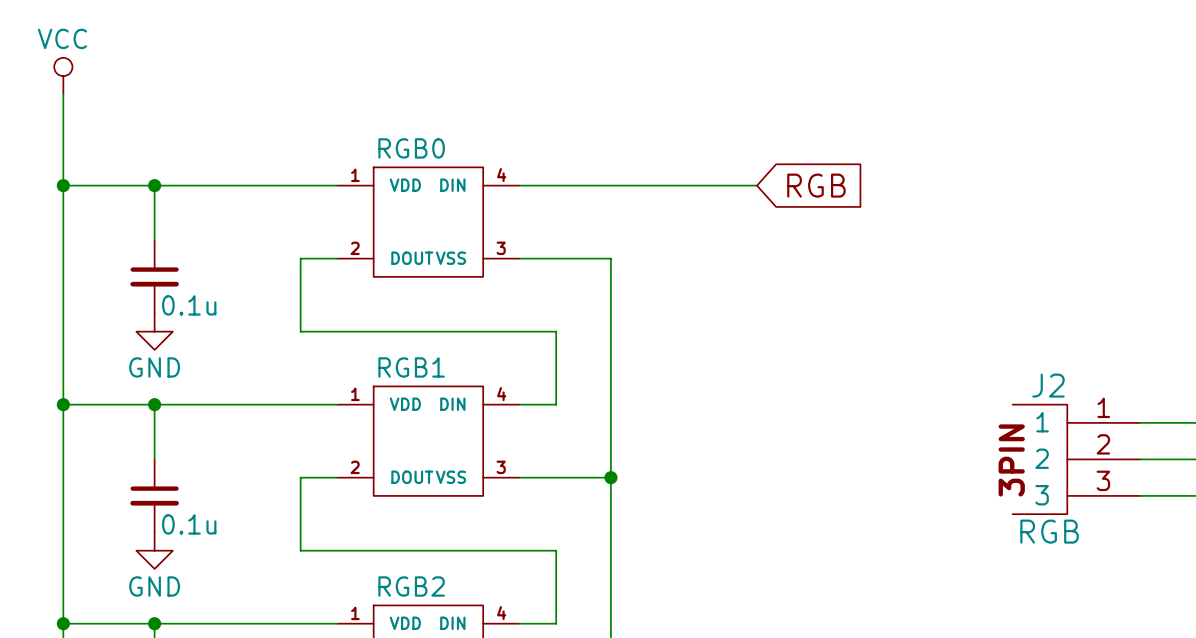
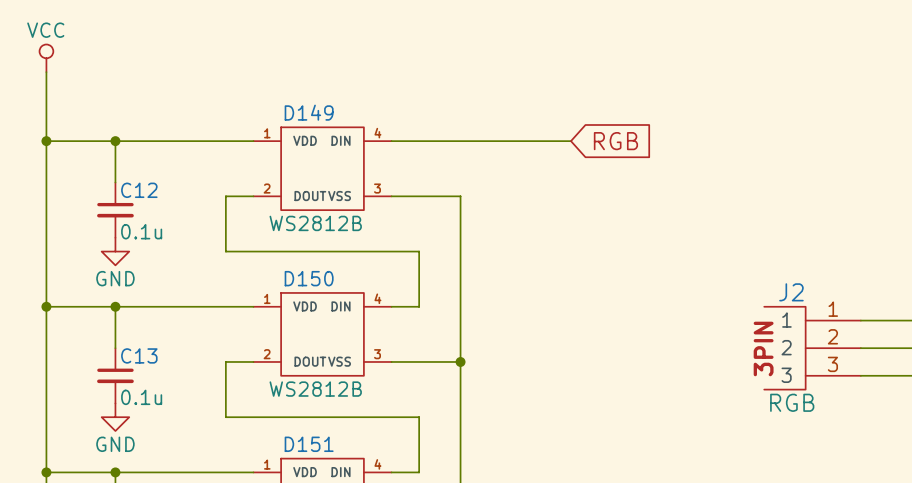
RGB0 name: RGB0 (411, 148) -> D149 (309, 112)
C12 name: none -> C12 (139, 190)
RGB0 value: none -> WS2812B (315, 223)
RGB1 name: RGB1 (411, 367) -> D150 (309, 278)
C13 name: none -> C13 (139, 355)
RGB1 value: none -> WS2812B (315, 389)
RGB2 name: RGB2 (411, 586) -> D151 (309, 444)

